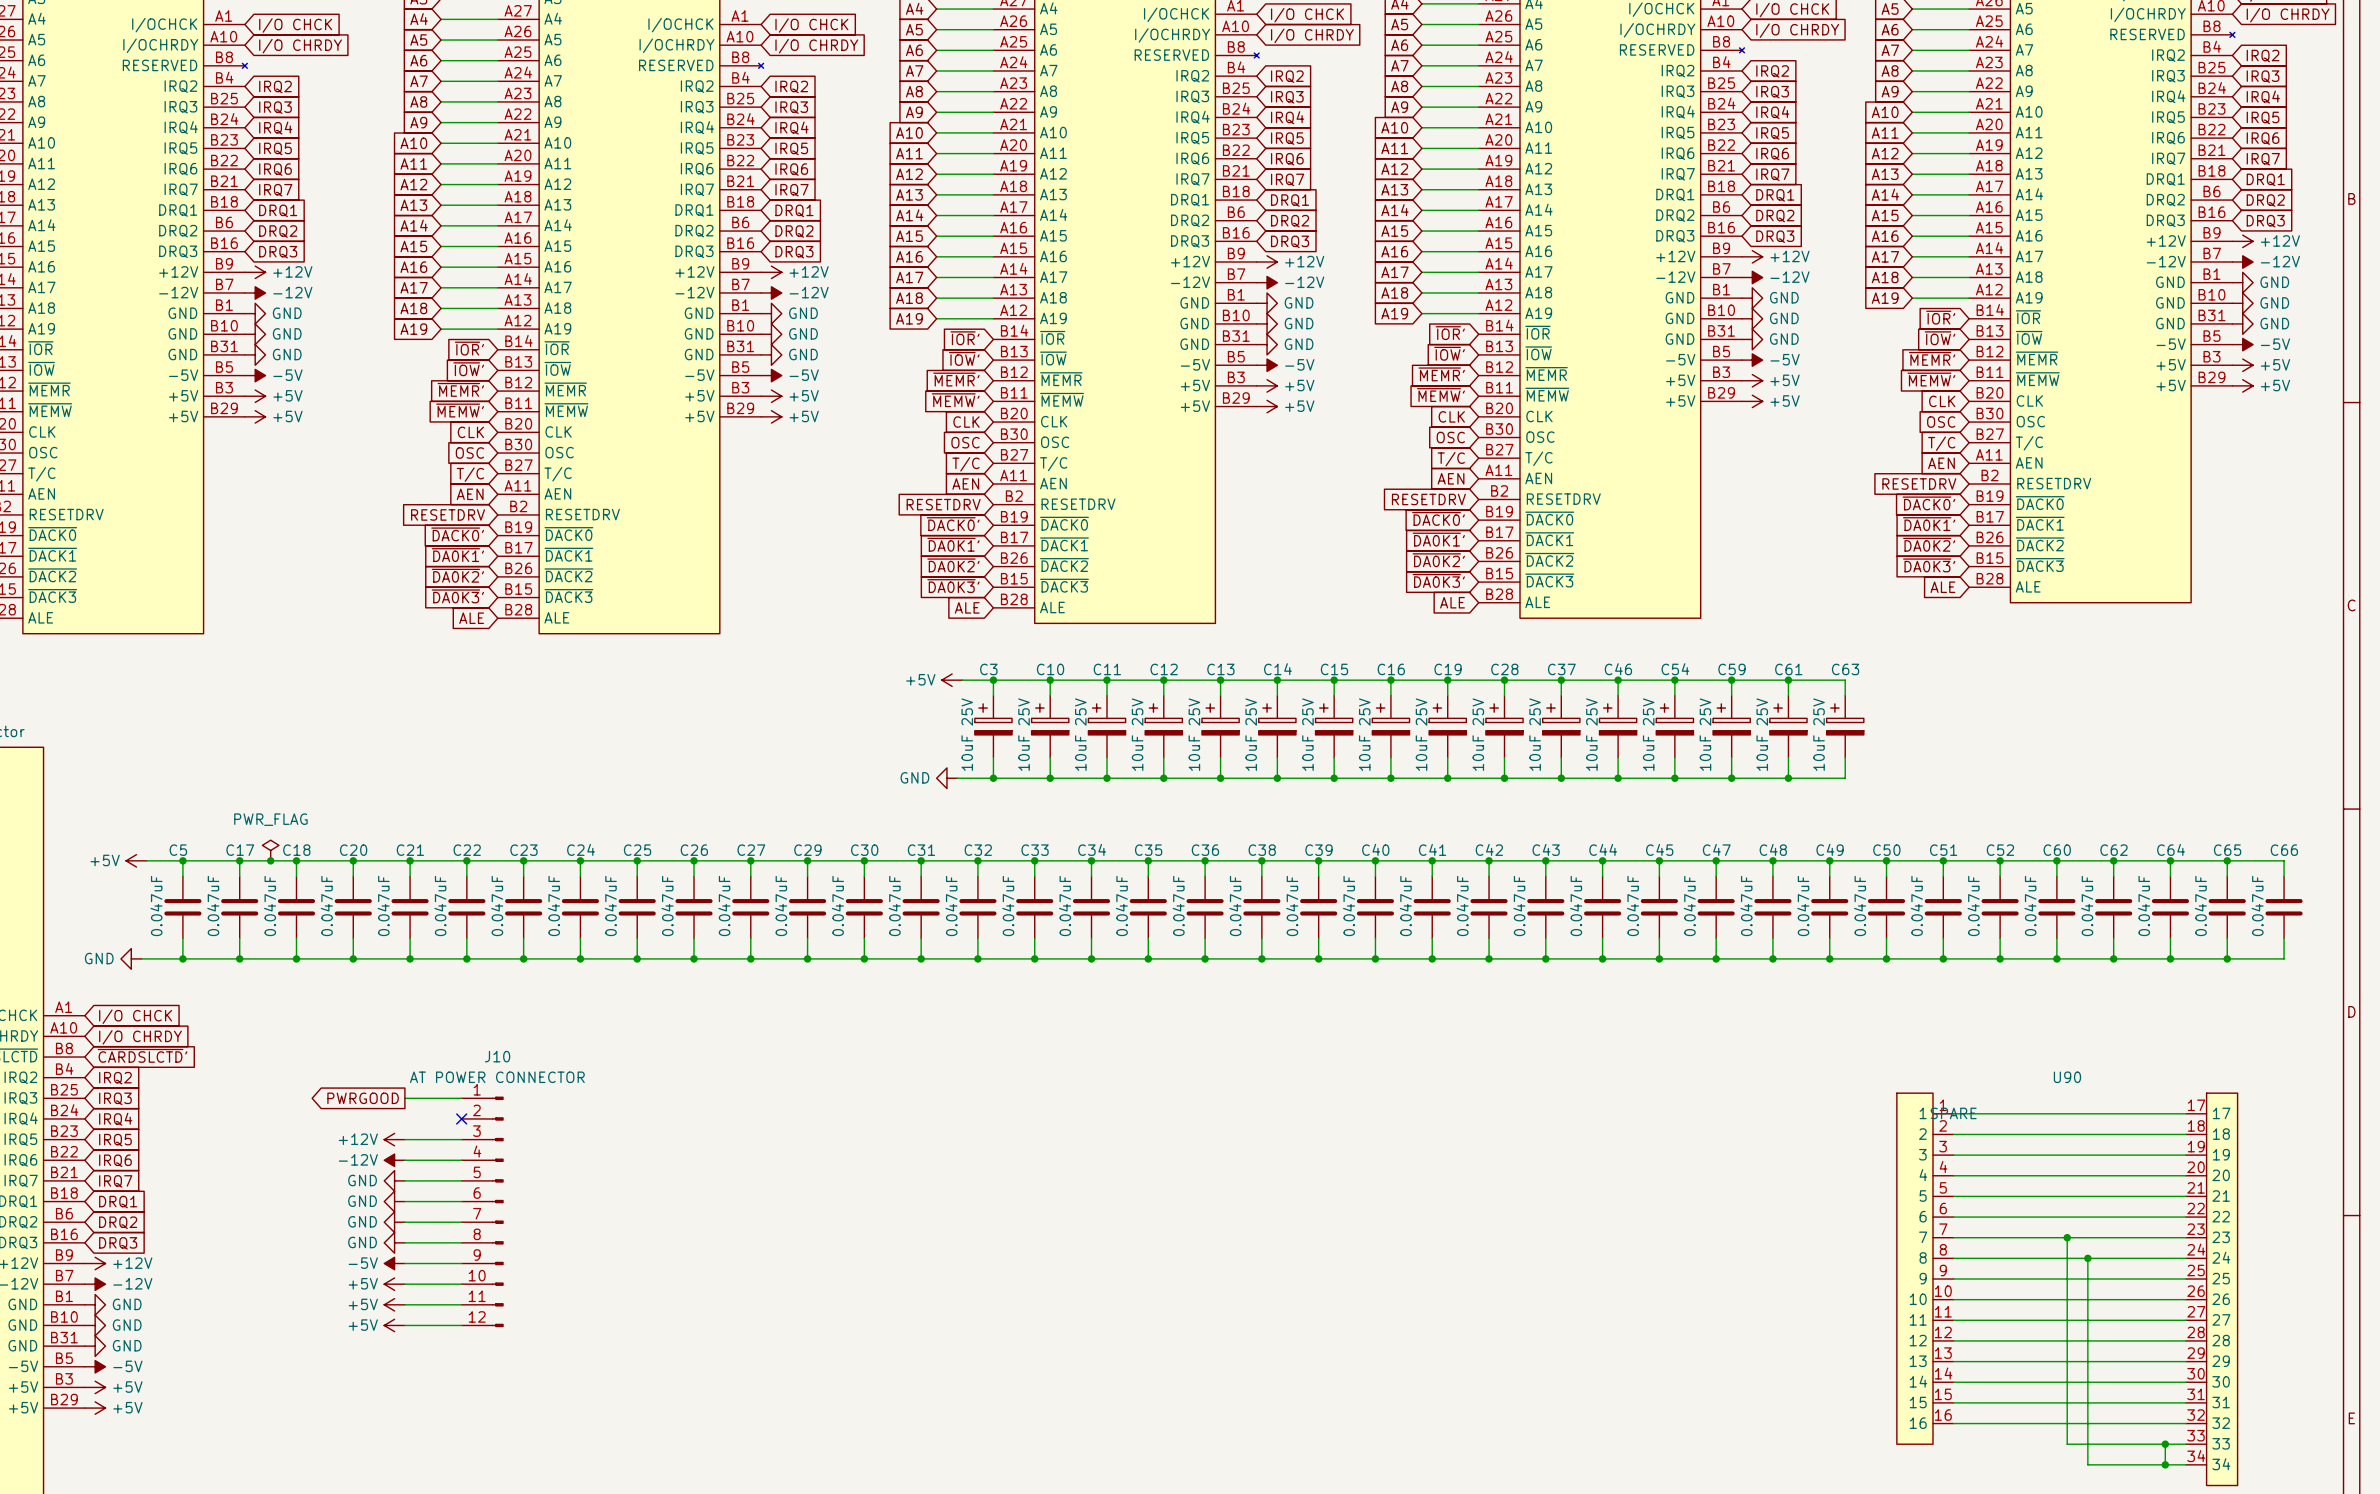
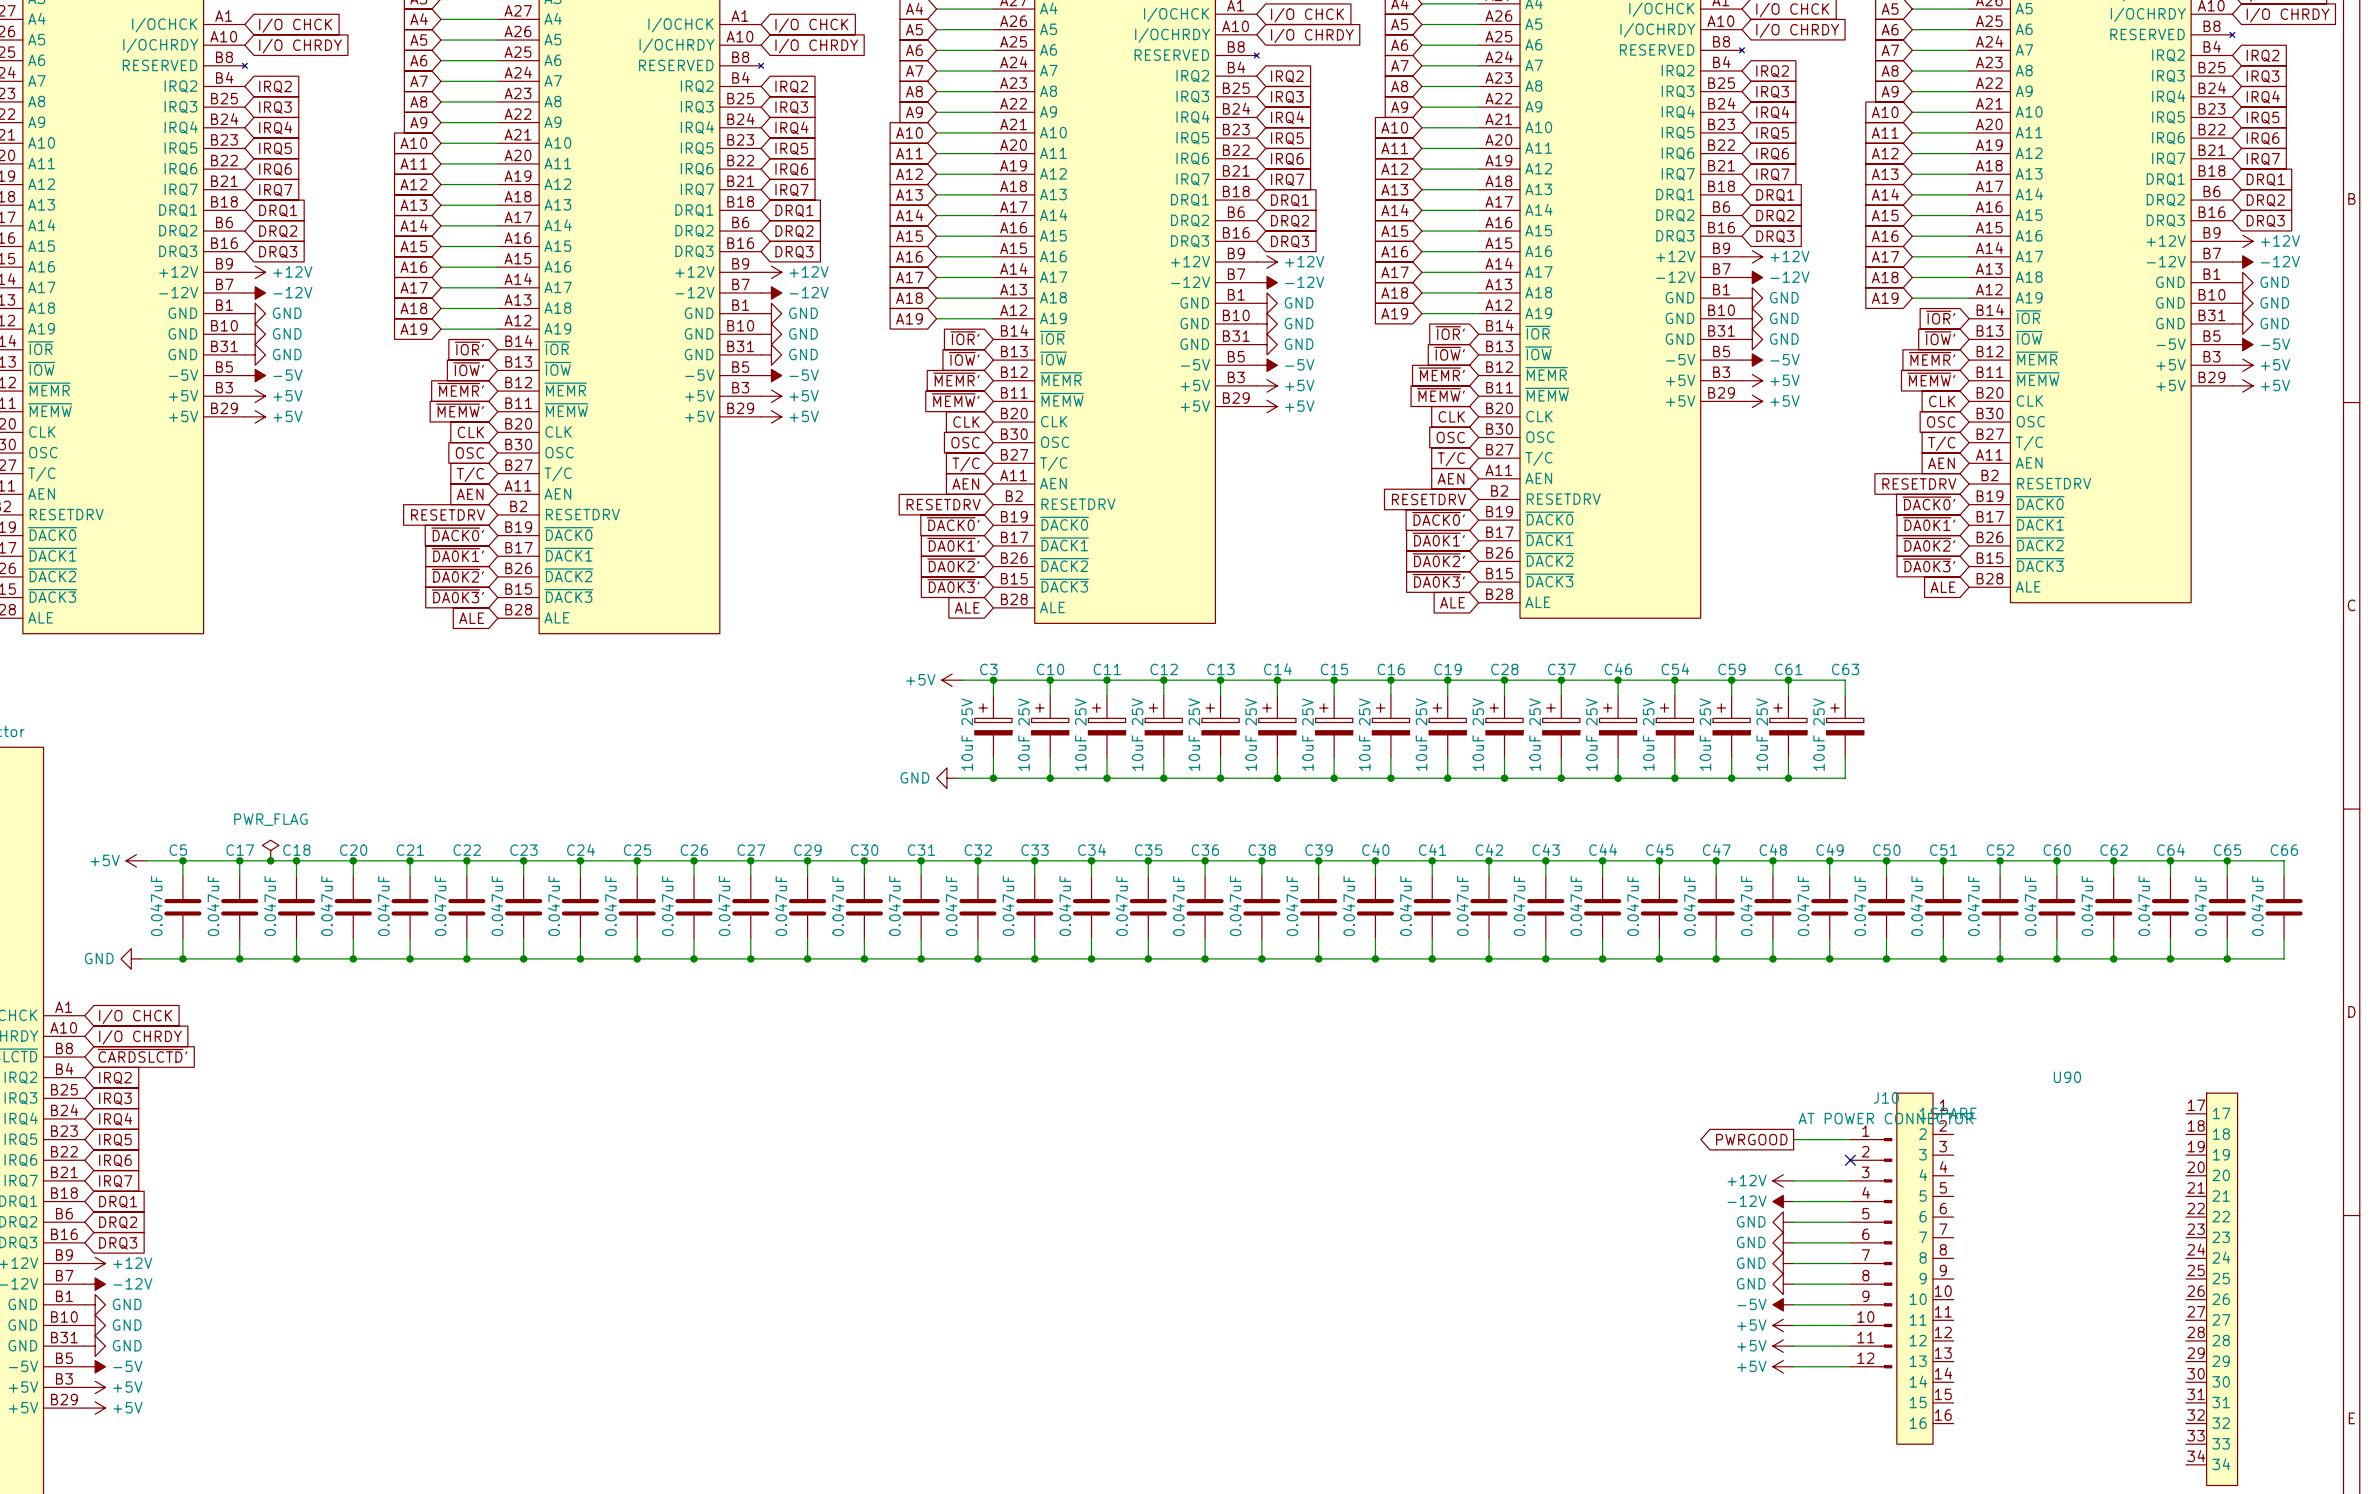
global label: PWRGOOD (363, 1098) -> none
wire: (404, 1098) (461, 1098) -> none
wire: (1953, 1113) (2185, 1113) -> none
no-connect mark: (461, 1118) -> none
wire: (1953, 1134) (2185, 1134) -> none
power symbol: +12V (394, 1139) -> none
wire: (404, 1139) (461, 1139) -> none
global label: none -> PWRGOOD (1751, 1139)
wire: none -> (1793, 1139) (1850, 1139)
wire: (1953, 1155) (2185, 1155) -> none
power symbol: -12V (394, 1160) -> none
wire: (404, 1160) (461, 1160) -> none
no-connect mark: none -> (1850, 1160)
wire: (1953, 1175) (2185, 1175) -> none
power symbol: GND (394, 1180) -> none
wire: (404, 1180) (461, 1180) -> none
power symbol: none -> +12V (1783, 1180)
wire: none -> (1793, 1180) (1850, 1180)
wire: (1953, 1196) (2185, 1196) -> none
power symbol: GND (394, 1201) -> none
wire: (404, 1201) (461, 1201) -> none
power symbol: none -> -12V (1783, 1201)
wire: none -> (1793, 1201) (1850, 1201)
J10 position: (482, 1211) -> (1871, 1253)
wire: (1953, 1217) (2185, 1217) -> none
power symbol: GND (394, 1222) -> none
wire: (404, 1222) (461, 1222) -> none
power symbol: none -> GND (1783, 1222)
wire: none -> (1793, 1222) (1850, 1222)
wire: (1953, 1237) (2185, 1237) -> none
wire: (2067, 1237) (2067, 1444) (2185, 1444) -> none
junction: (2067, 1237) -> none
power symbol: GND (394, 1242) -> none
wire: (404, 1242) (461, 1242) -> none
power symbol: none -> GND (1783, 1242)
wire: none -> (1793, 1242) (1850, 1242)
wire: (1953, 1258) (2185, 1258) -> none
wire: (2087, 1258) (2087, 1464) (2185, 1464) -> none
junction: (2087, 1258) -> none
power symbol: -5V (394, 1263) -> none
wire: (404, 1263) (461, 1263) -> none
power symbol: none -> GND (1783, 1263)
wire: none -> (1793, 1263) (1850, 1263)
wire: (1953, 1279) (2185, 1279) -> none
power symbol: +5V (394, 1284) -> none
wire: (404, 1284) (461, 1284) -> none
power symbol: none -> GND (1783, 1284)
wire: none -> (1793, 1284) (1850, 1284)
wire: (1953, 1299) (2185, 1299) -> none
power symbol: +5V (394, 1304) -> none
wire: (404, 1304) (461, 1304) -> none
power symbol: none -> -5V (1783, 1304)
wire: none -> (1793, 1304) (1850, 1304)
wire: (1953, 1320) (2185, 1320) -> none
power symbol: +5V (394, 1325) -> none
wire: (404, 1325) (461, 1325) -> none
power symbol: none -> +5V (1783, 1325)
wire: none -> (1793, 1325) (1850, 1325)
wire: (1953, 1340) (2185, 1340) -> none
power symbol: none -> +5V (1783, 1346)
wire: none -> (1793, 1346) (1850, 1346)
wire: (1953, 1361) (2185, 1361) -> none
power symbol: none -> +5V (1783, 1366)
wire: none -> (1793, 1366) (1850, 1366)
wire: (1953, 1382) (2185, 1382) -> none
wire: (1953, 1402) (2185, 1402) -> none
wire: (1953, 1423) (2185, 1423) -> none
wire: (2165, 1444) (2165, 1464) -> none
junction: (2165, 1444) -> none
junction: (2165, 1464) -> none

